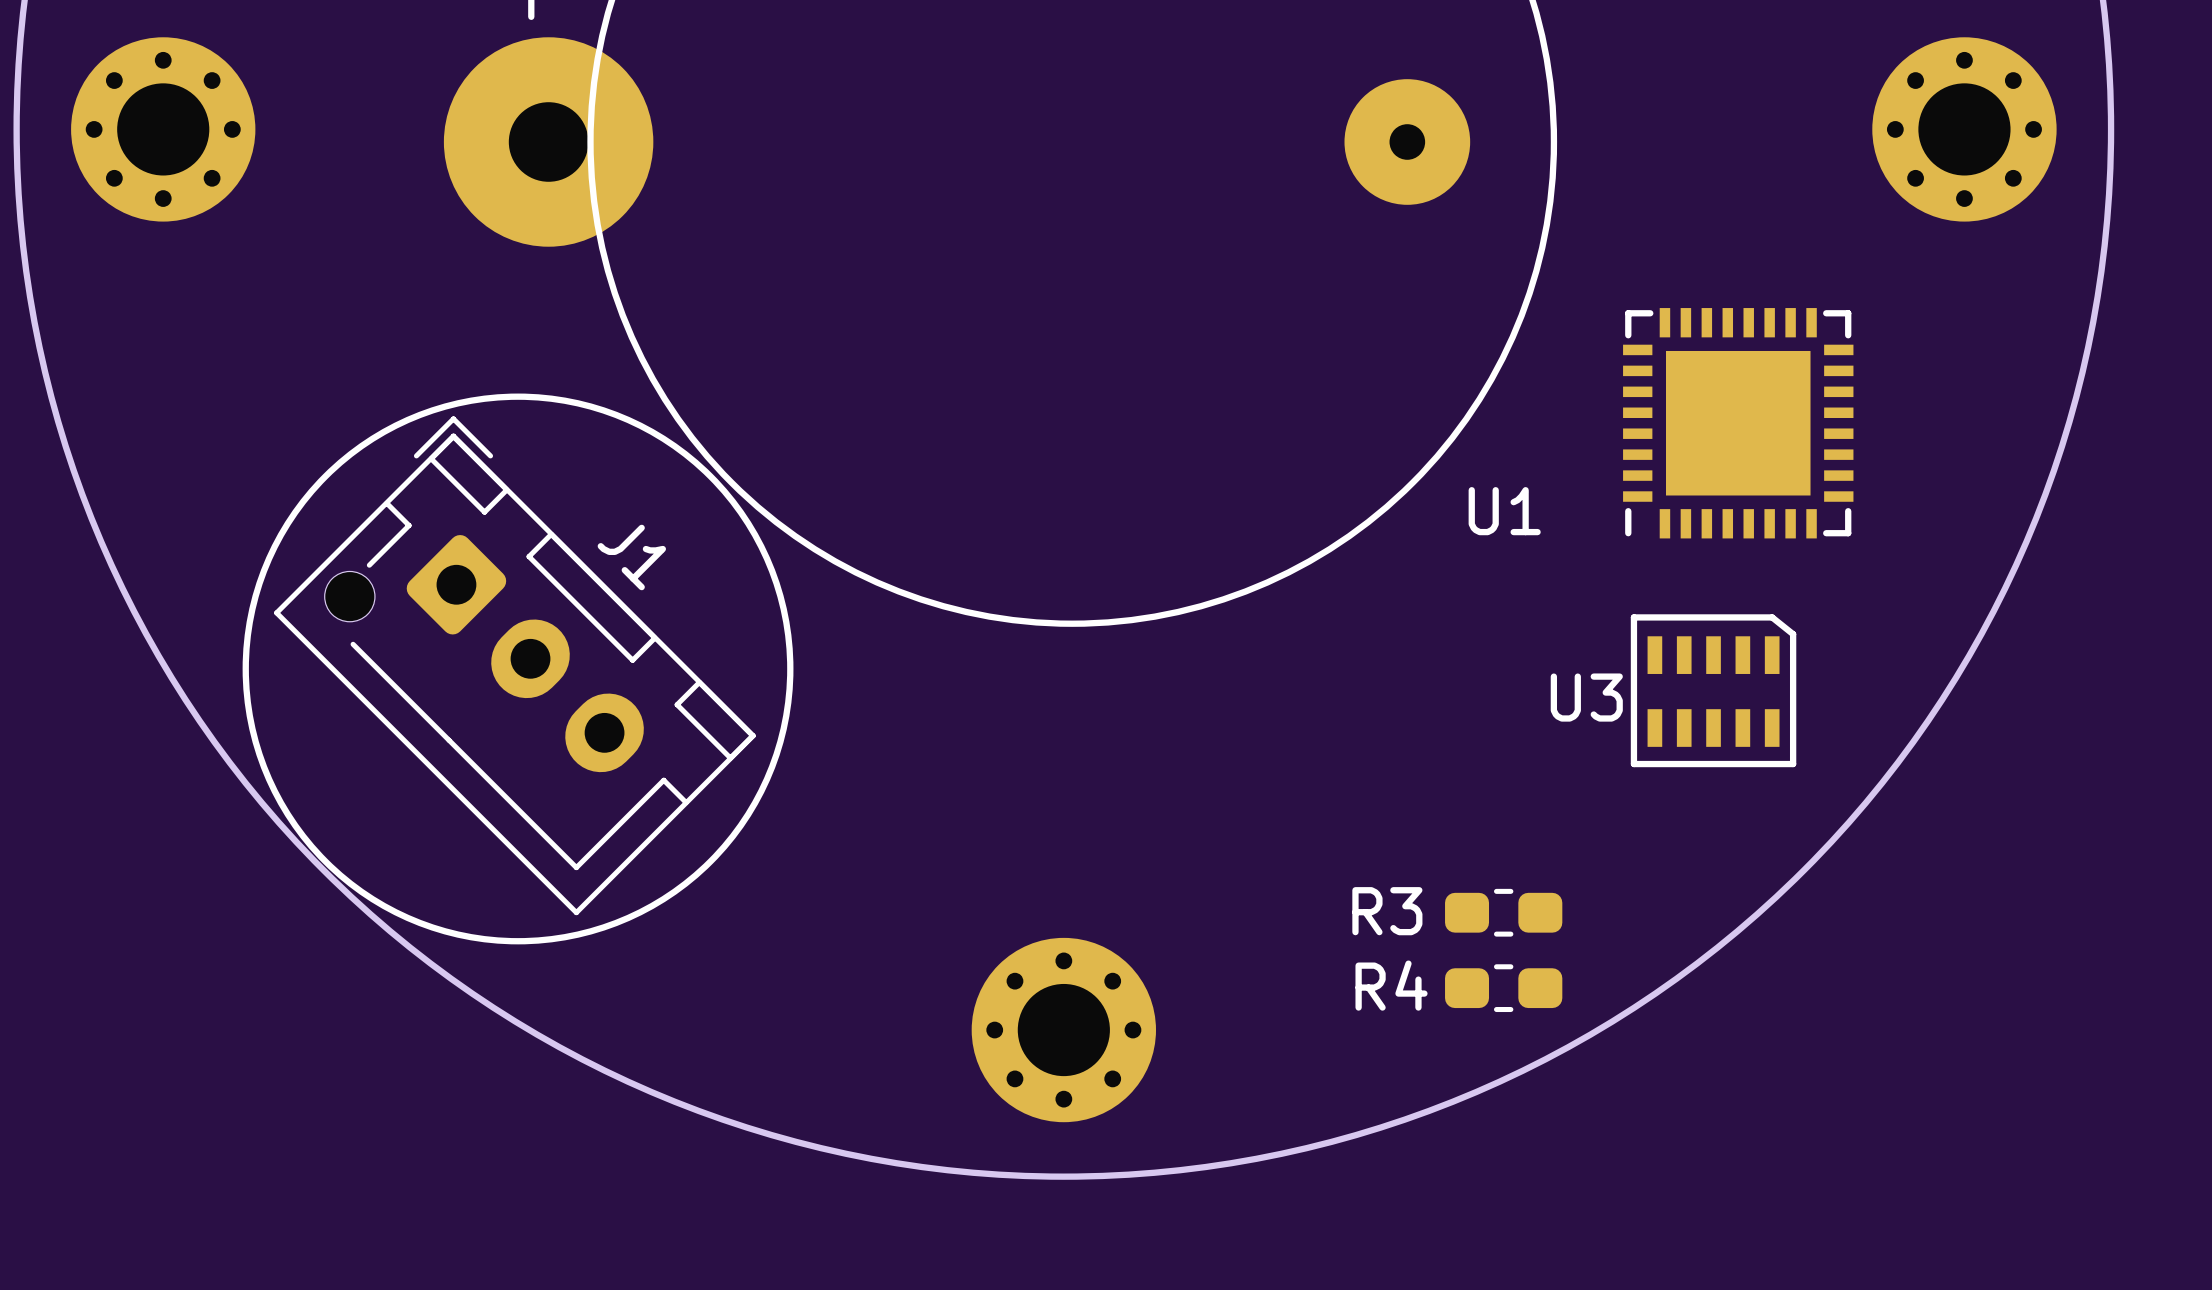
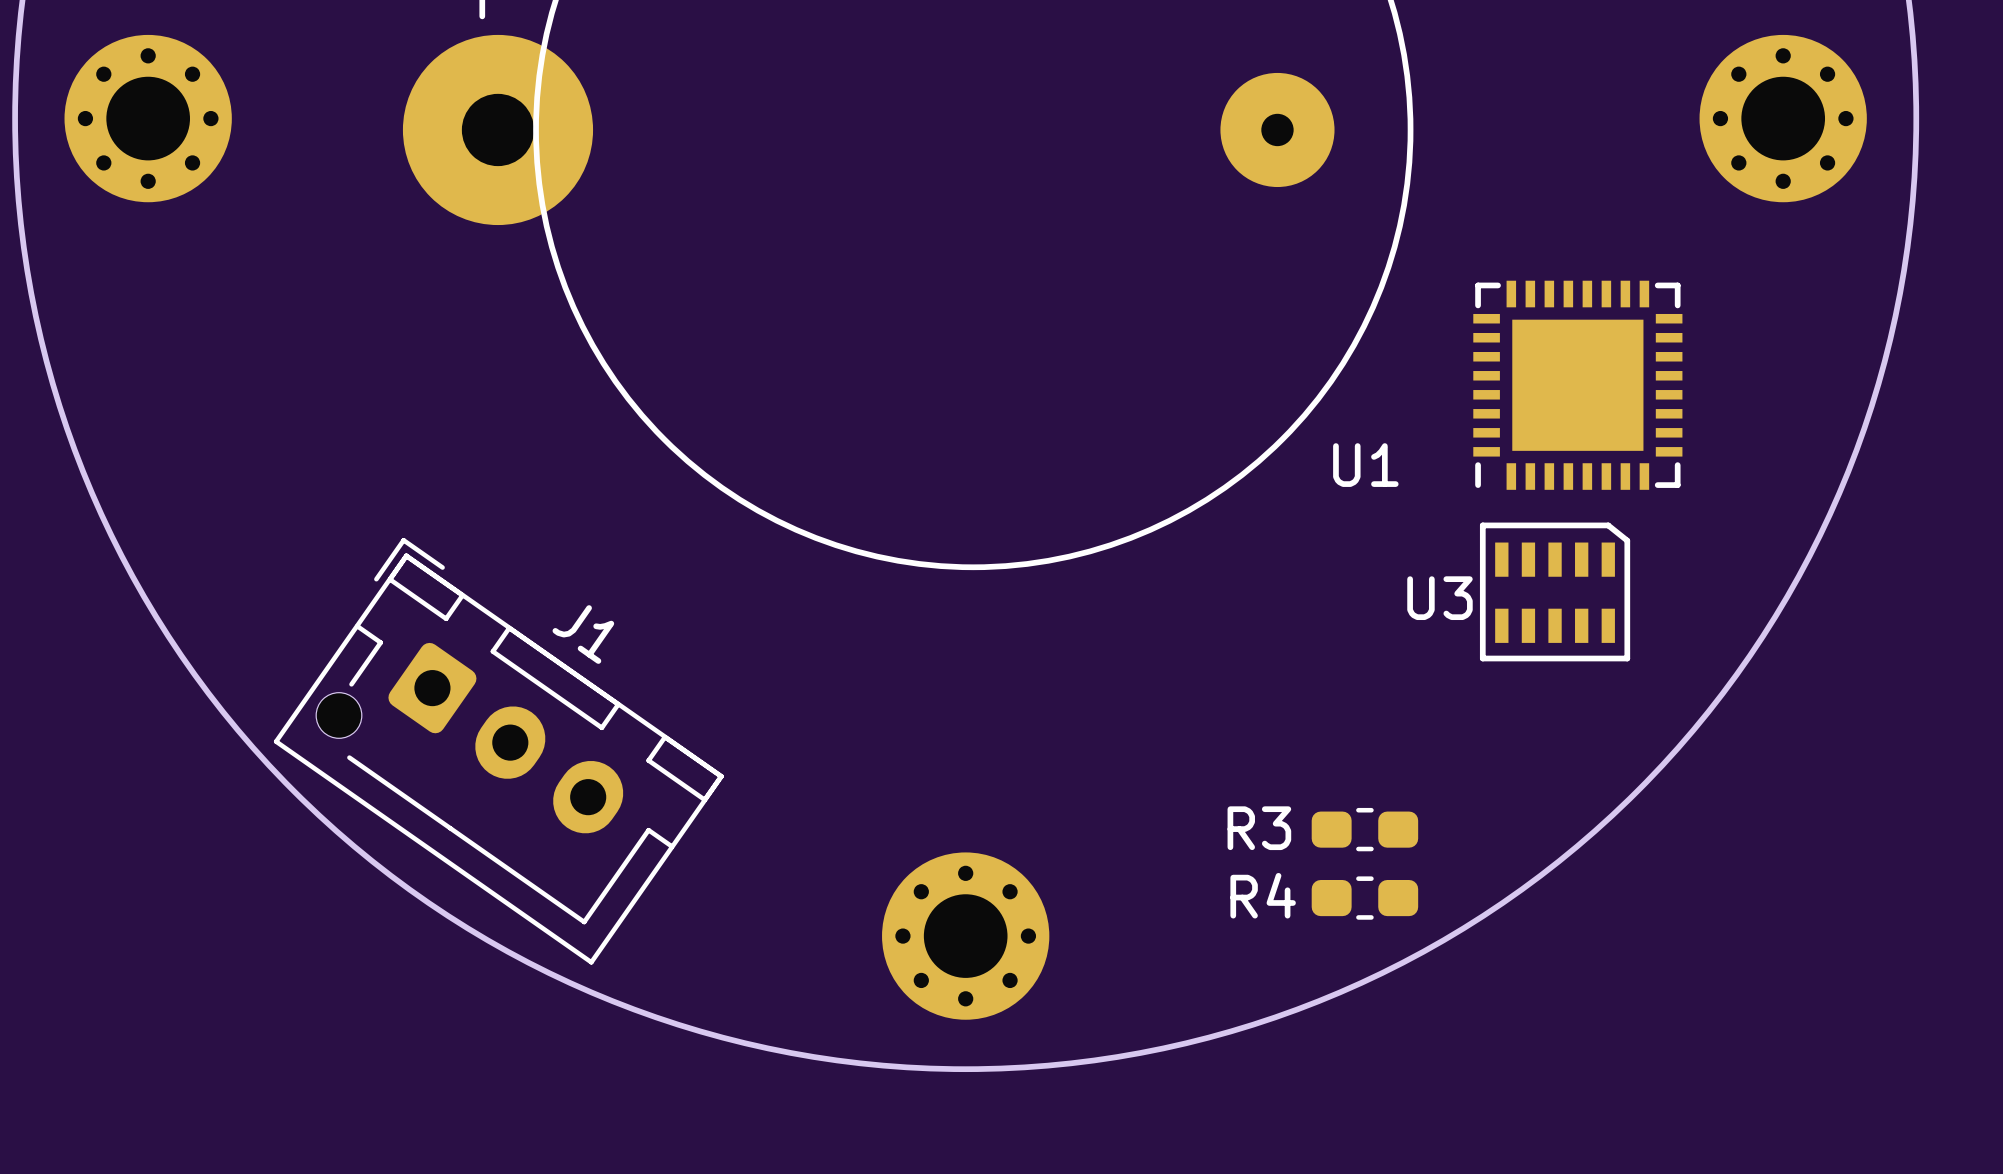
drawing: [242, 393, 794, 945] -> none
J1 footprint: [274, 416, 756, 916] -> [273, 538, 724, 965]
U3 position: (1713, 690) -> (1555, 591)

